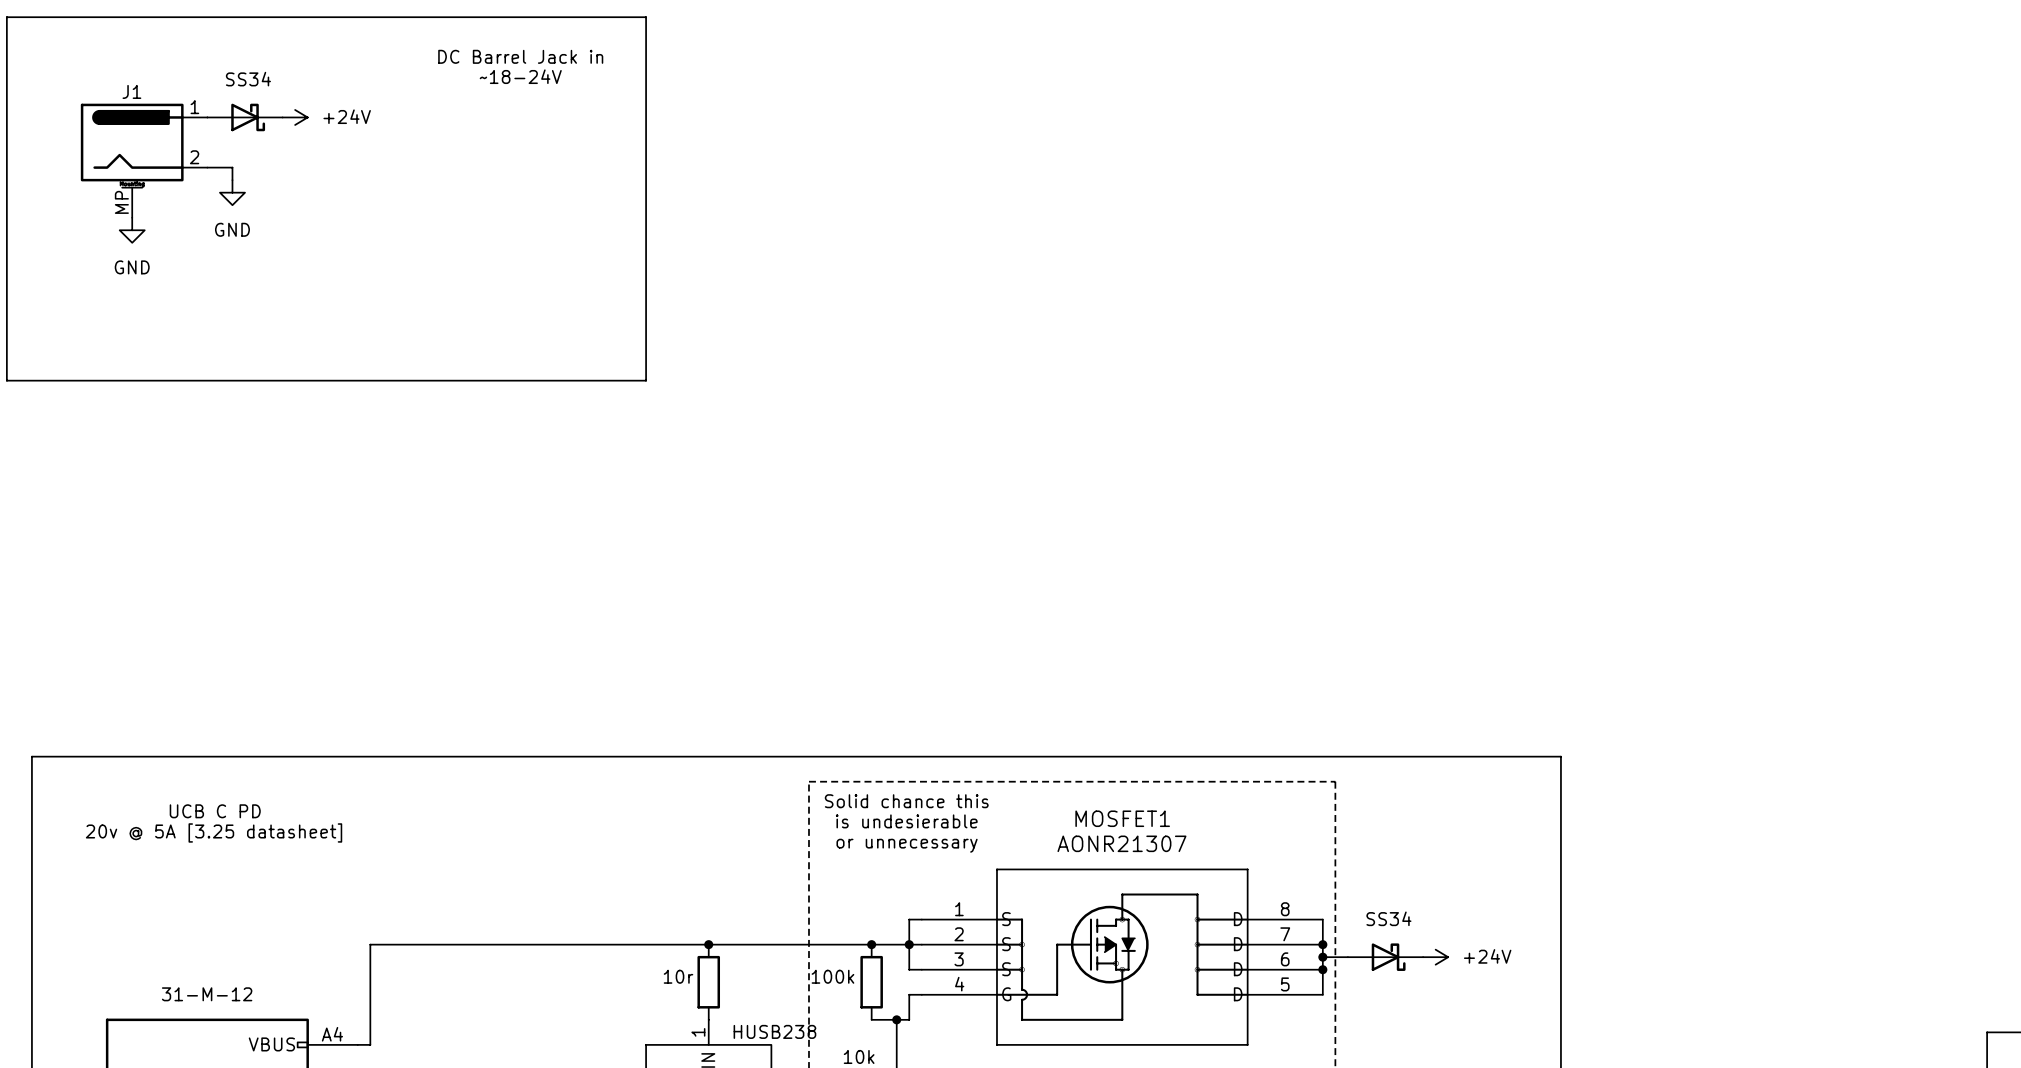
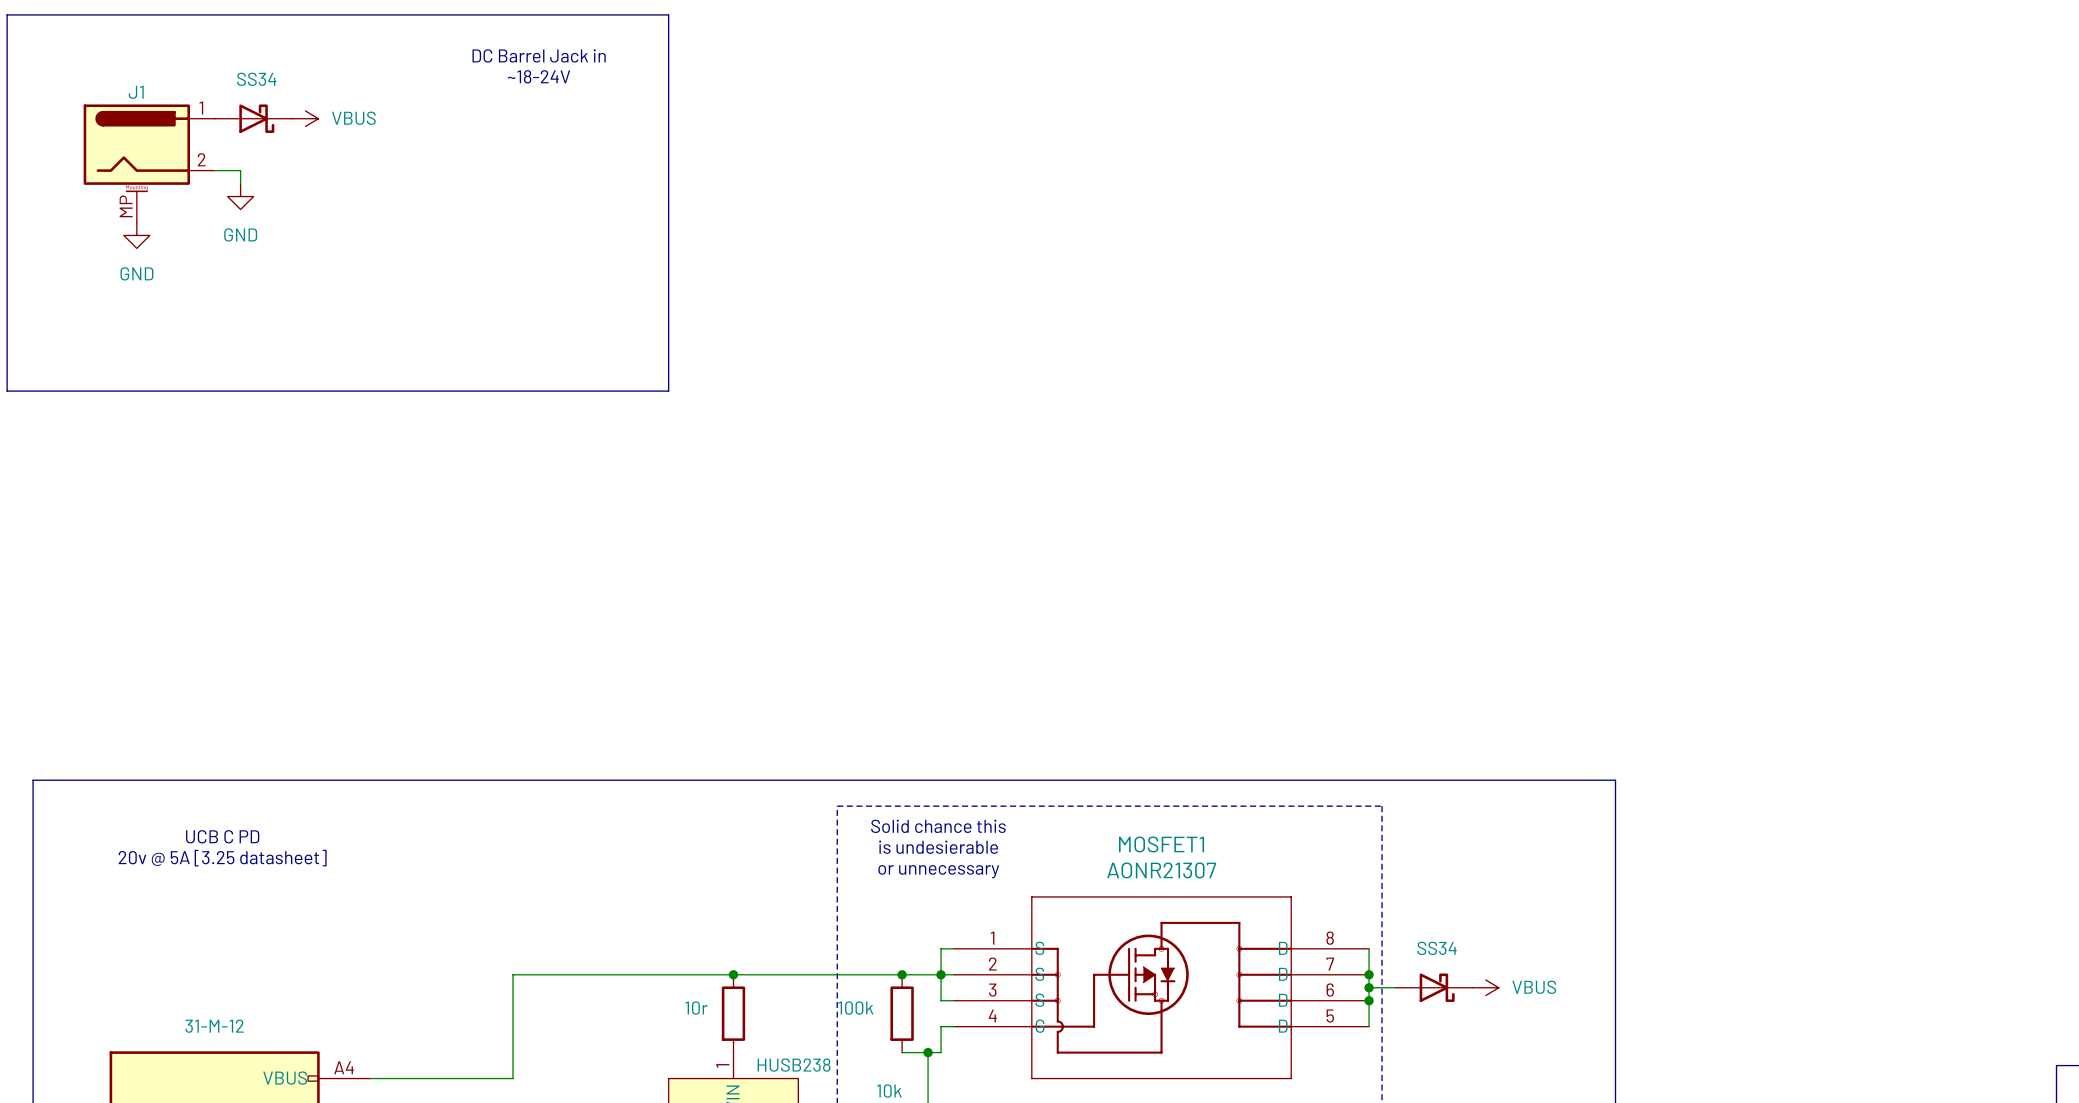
power symbol: +24V (295, 117) -> VBUS (305, 118)
wire: (495, 944) (370, 944) (370, 1044) -> (512, 974) (512, 1078) (383, 1078)
power symbol: +24V (1435, 957) -> VBUS (1485, 987)

